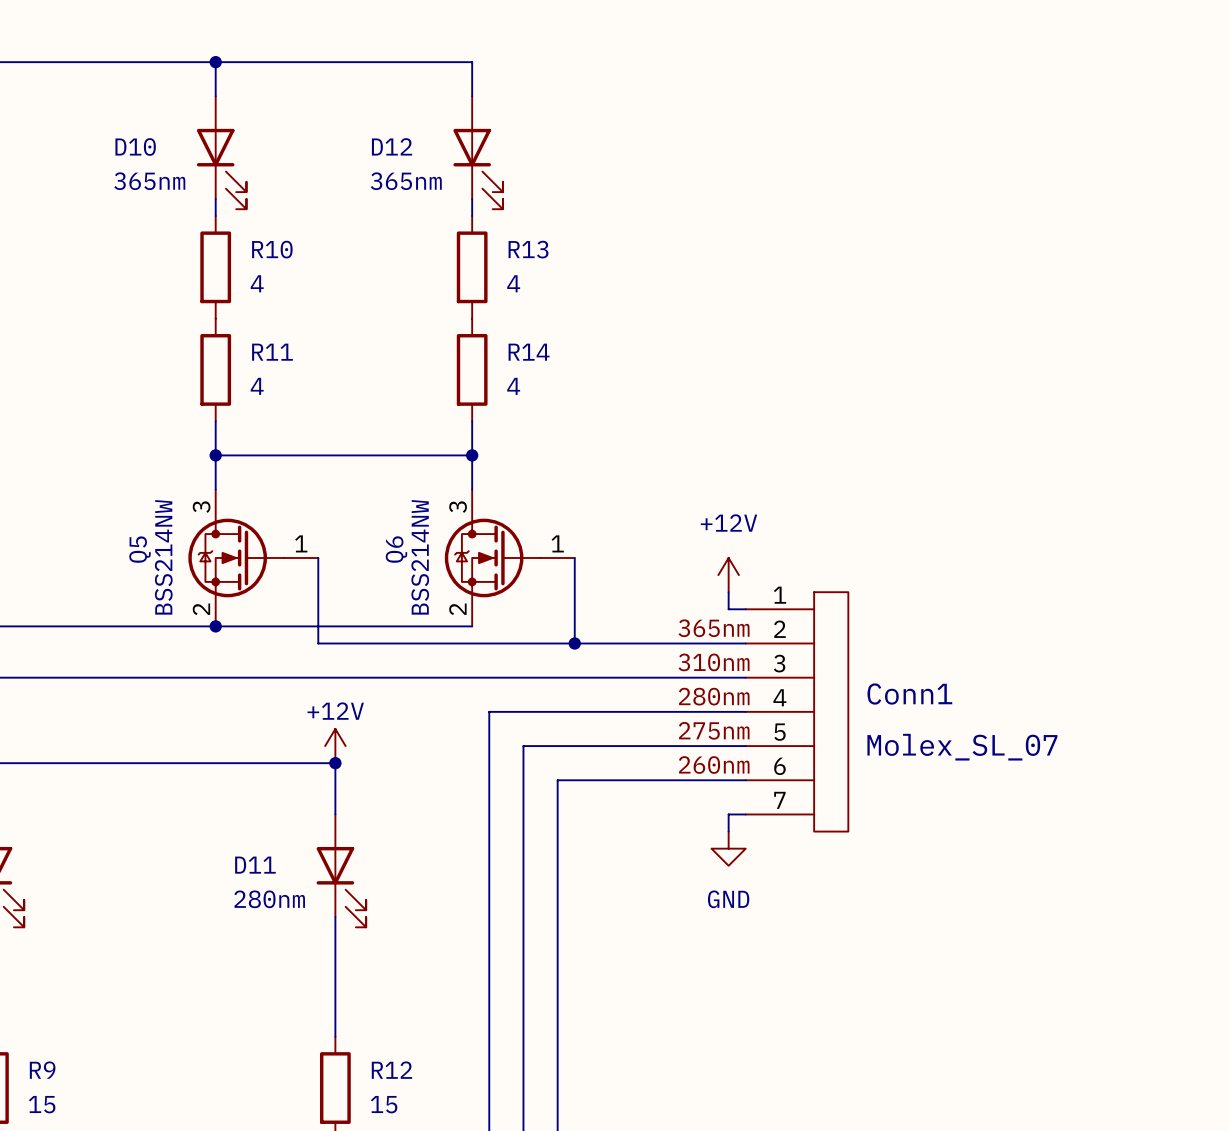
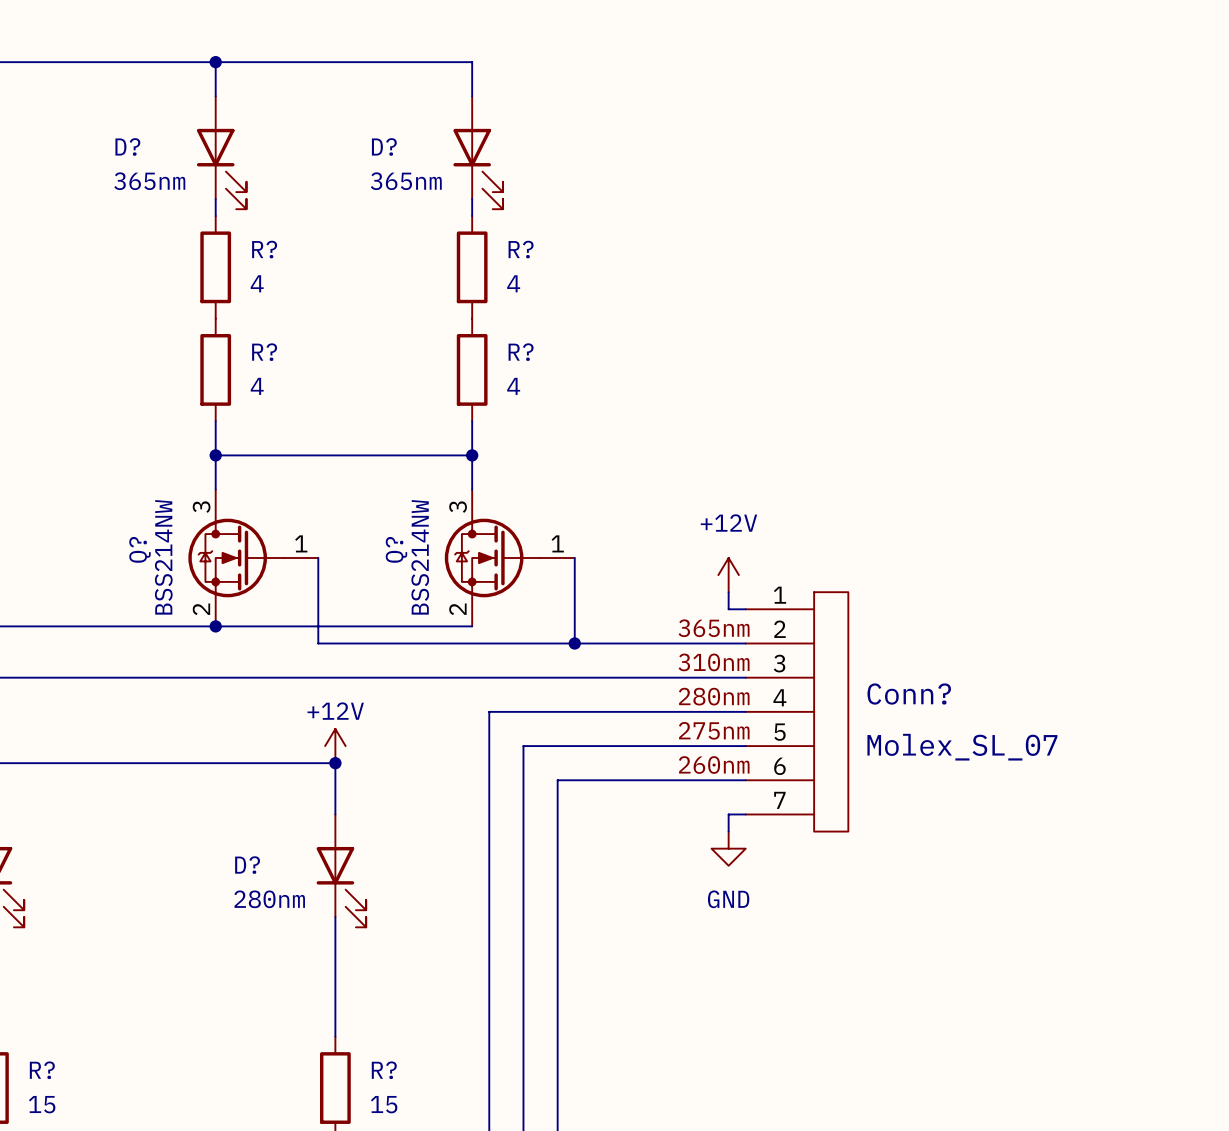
D12 name: D12 (392, 146) -> D? (384, 146)
D10 name: D10 (135, 147) -> D? (127, 146)
R10 name: R10 (272, 249) -> R? (264, 249)
R13 name: R13 (528, 249) -> R? (521, 249)
R11 name: R11 (272, 352) -> R? (264, 352)
R14 name: R14 (529, 352) -> R? (521, 352)
Q5 name: Q5 (139, 549) -> Q? (139, 549)
Q6 name: Q6 (396, 549) -> Q? (396, 549)
Conn1 name: Conn1 (909, 694) -> Conn? (909, 694)
D11 name: D11 (255, 865) -> D? (247, 865)
R9 name: R9 (42, 1070) -> R? (42, 1070)
R12 name: R12 (391, 1070) -> R? (384, 1070)

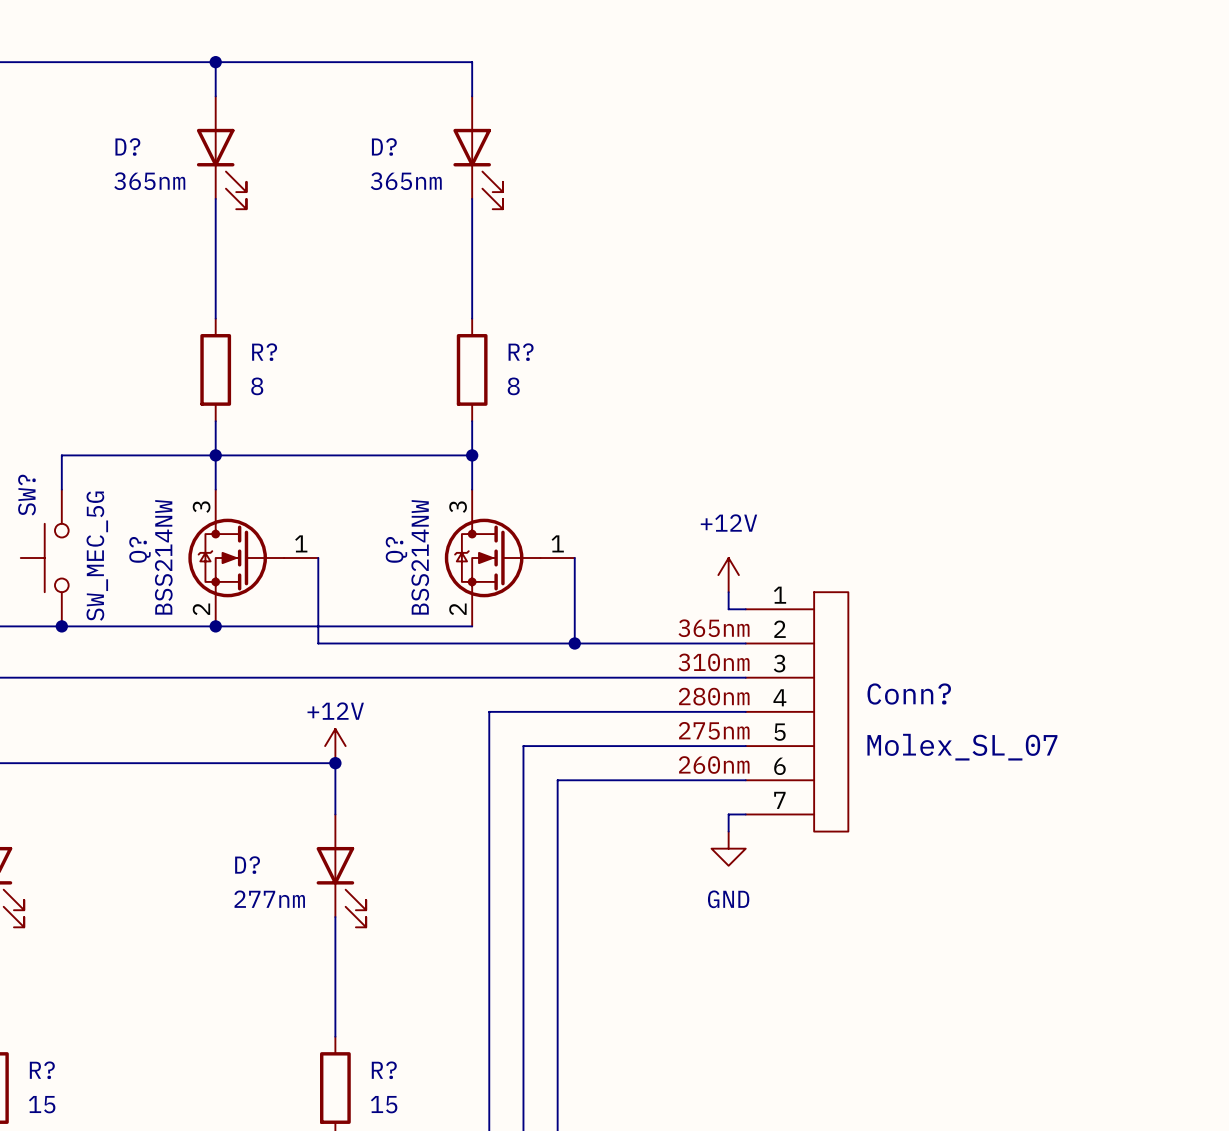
wire: none -> (215, 216) (215, 318)
wire: none -> (472, 216) (472, 318)
R?: 4 (215, 267) -> none
R?: 4 (472, 267) -> none
R? value: 4 (257, 386) -> 8 (257, 386)
R? value: 4 (513, 386) -> 8 (513, 386)
wire: none -> (215, 455) (61, 455) (61, 489)
SW?: none -> SW_MEC_5G (44, 558)
junction: none -> (61, 626)
D? value: 280nm (269, 899) -> 277nm (269, 899)

